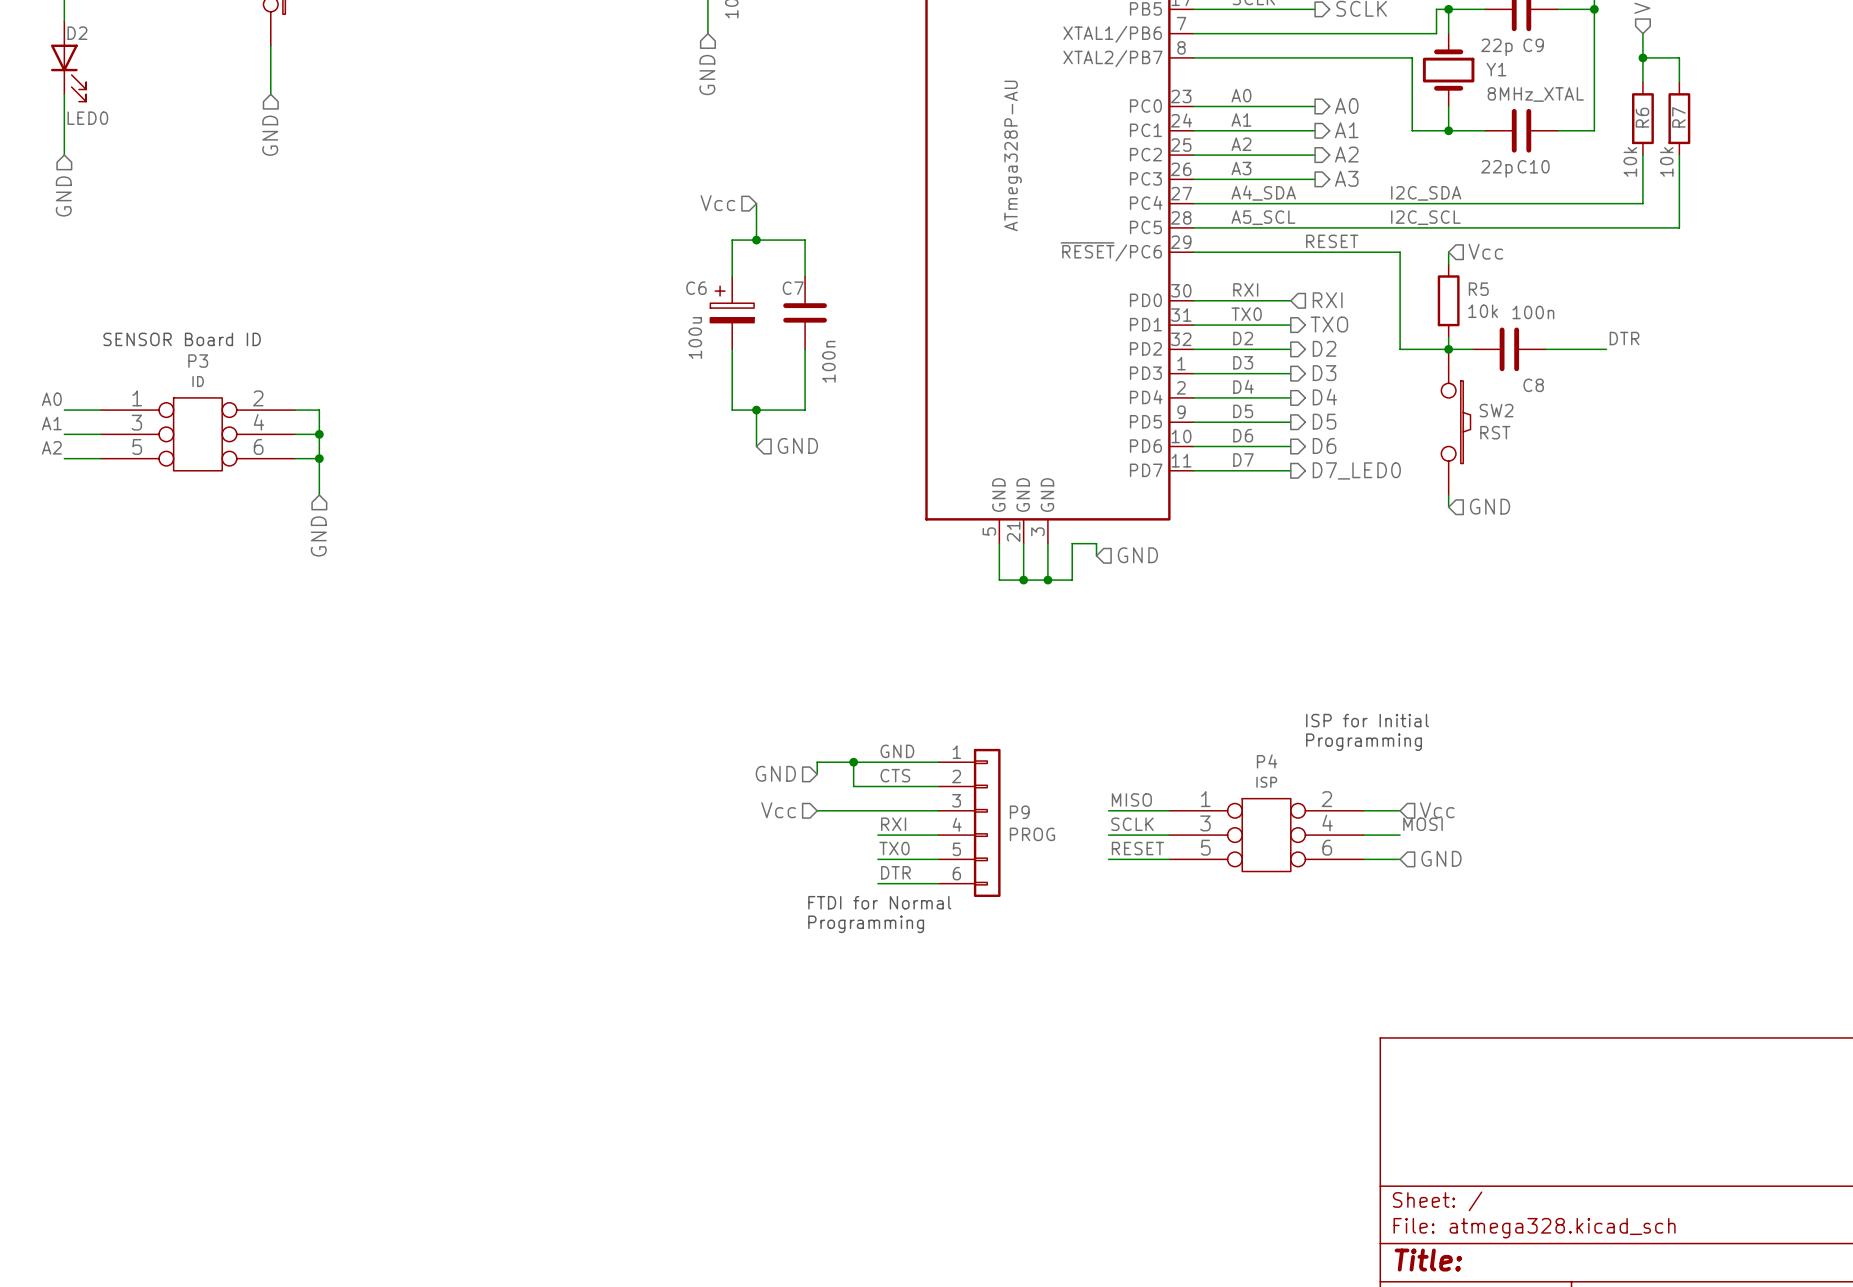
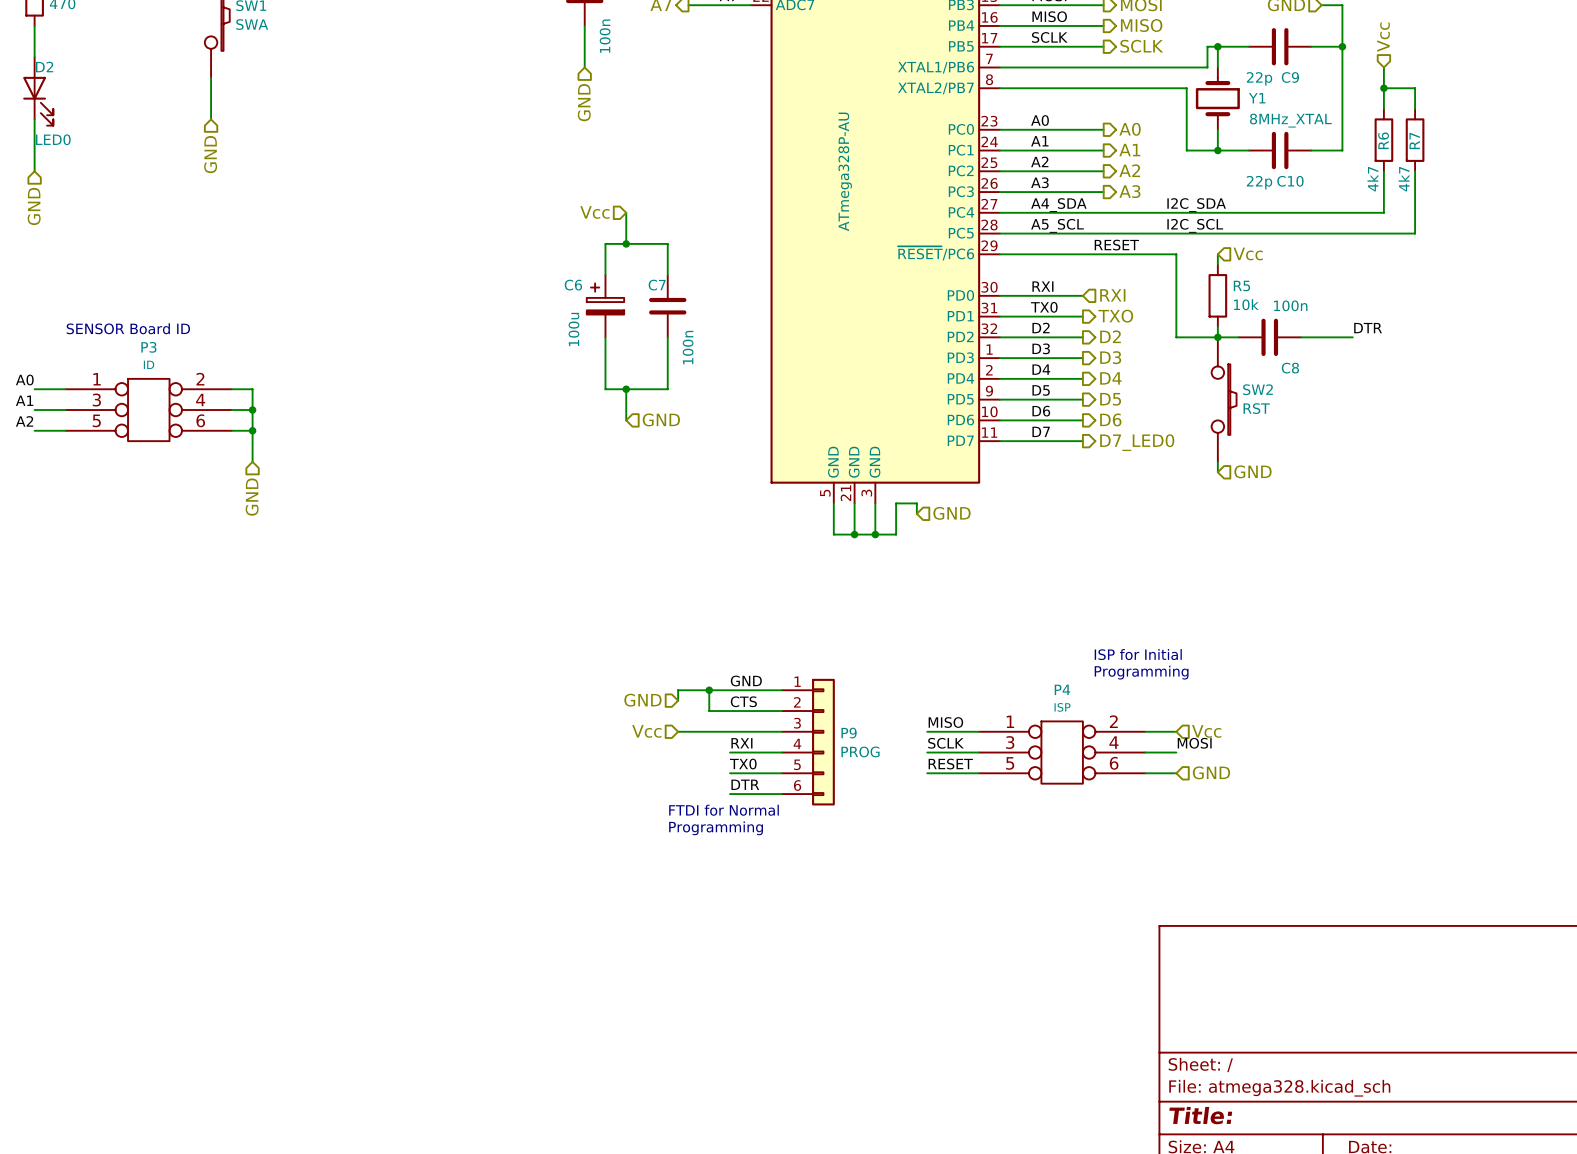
R6 value: 10k (1630, 161) -> 4k7 (1372, 179)
R7 value: 10k (1666, 161) -> 4k7 (1404, 179)

